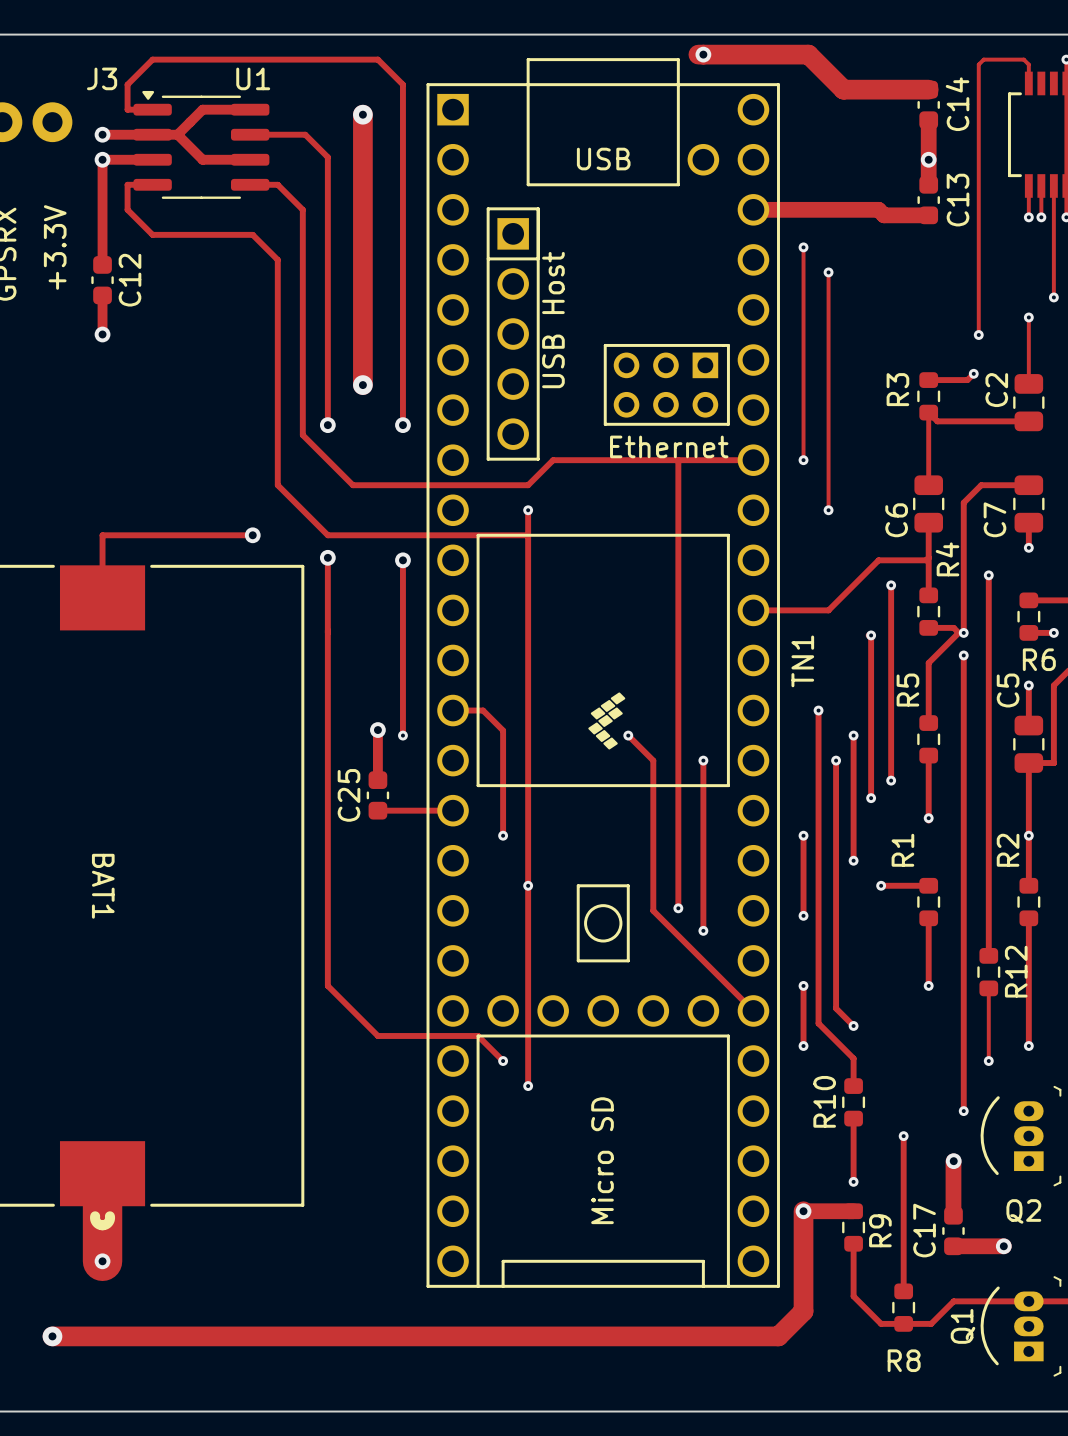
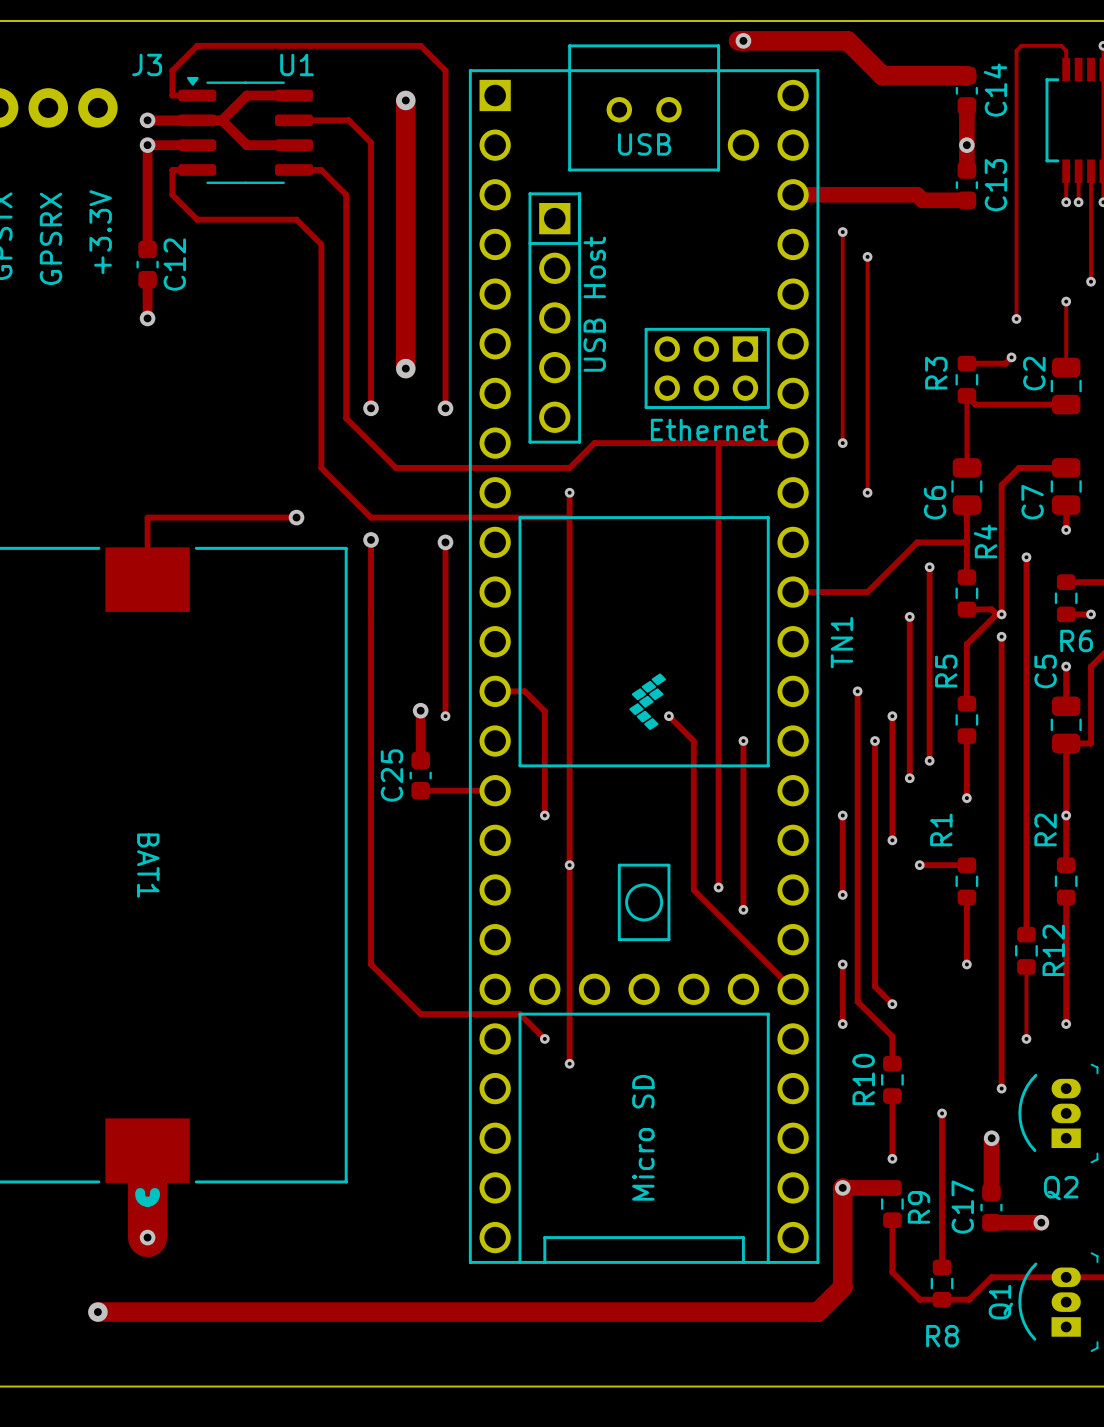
TN1 footprint: [426, 58, 780, 1288] -> [468, 44, 820, 1264]

